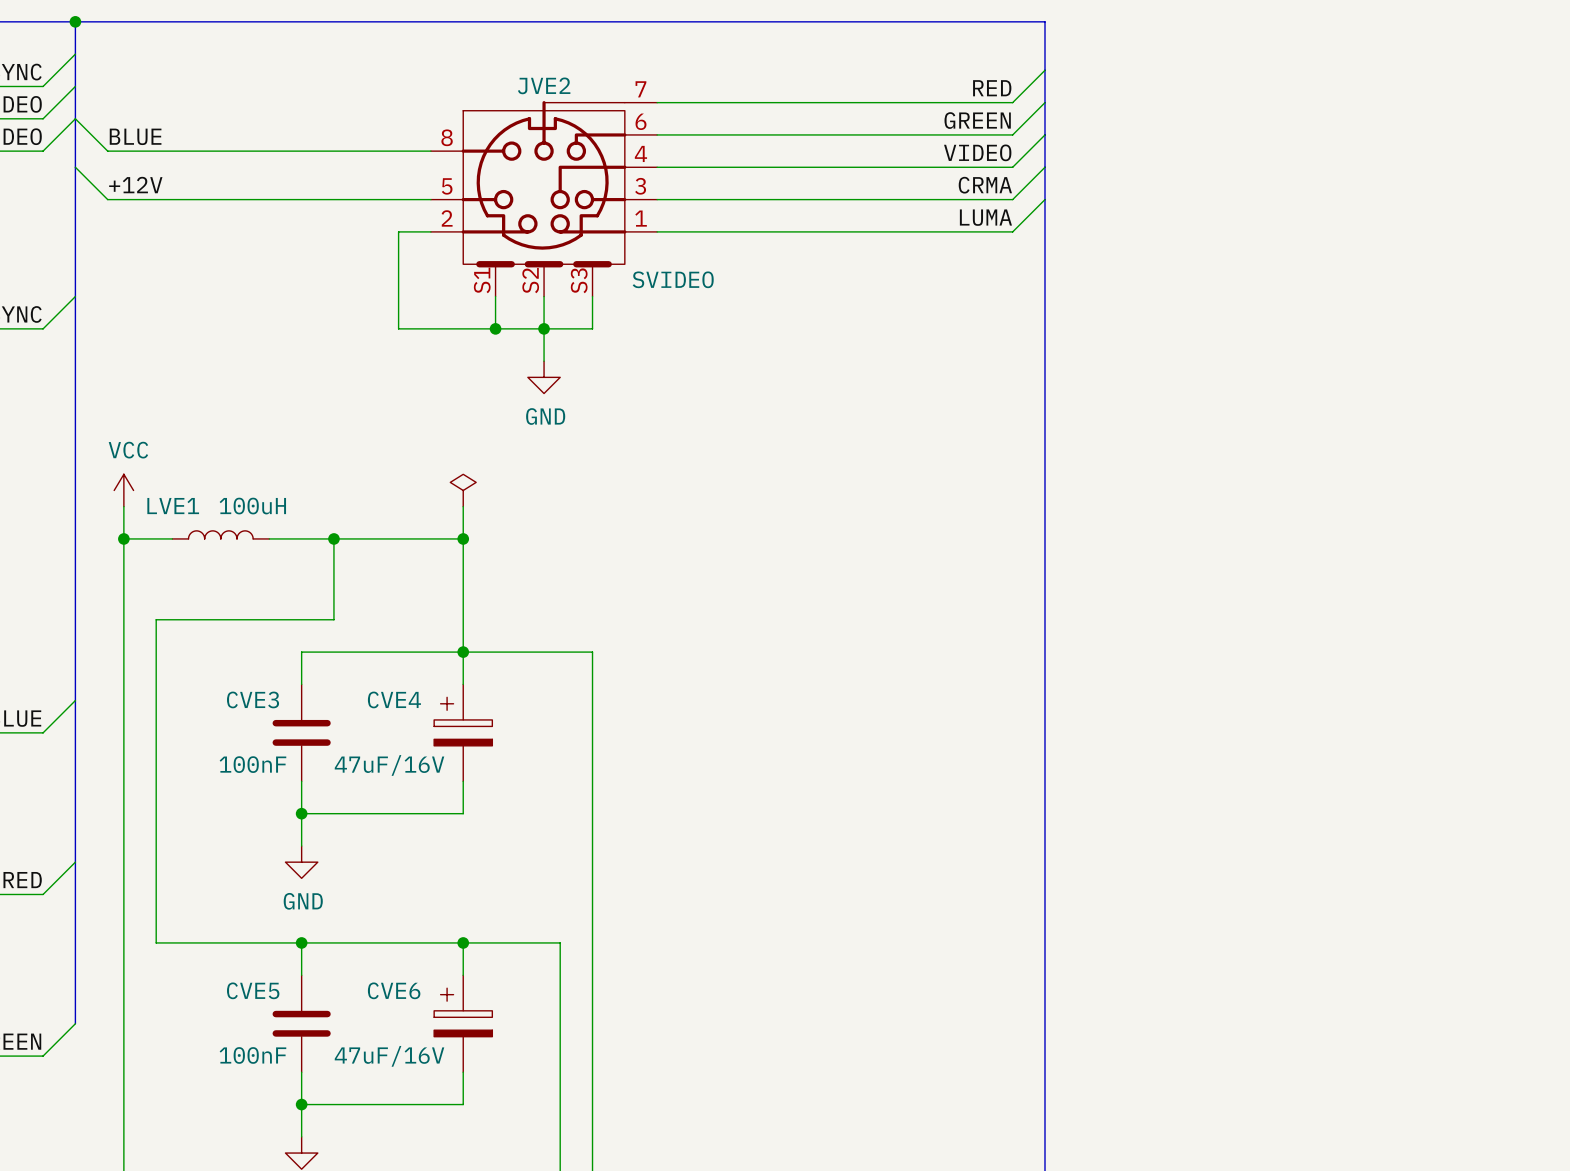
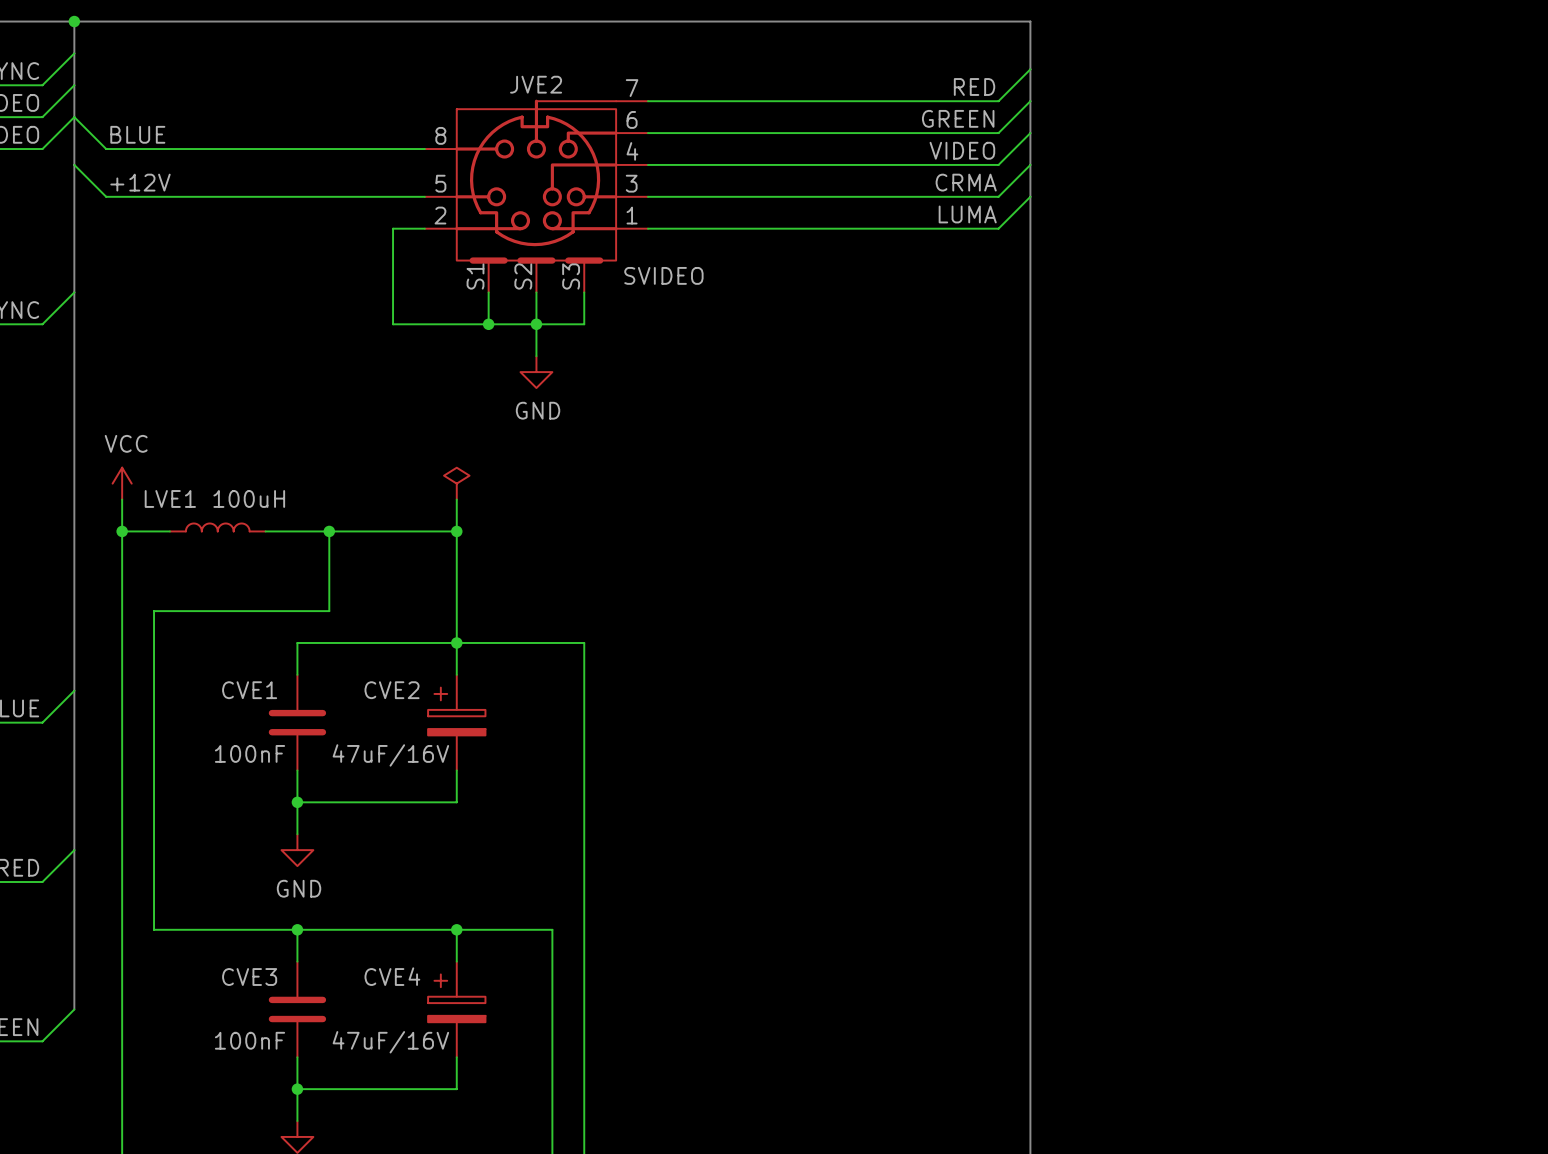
CVE3 name: CVE3 (253, 699) -> CVE1 (249, 690)
CVE4 name: CVE4 (394, 699) -> CVE2 (392, 690)
CVE5 name: CVE5 (253, 990) -> CVE3 (249, 977)
CVE6 name: CVE6 (394, 990) -> CVE4 (392, 976)

